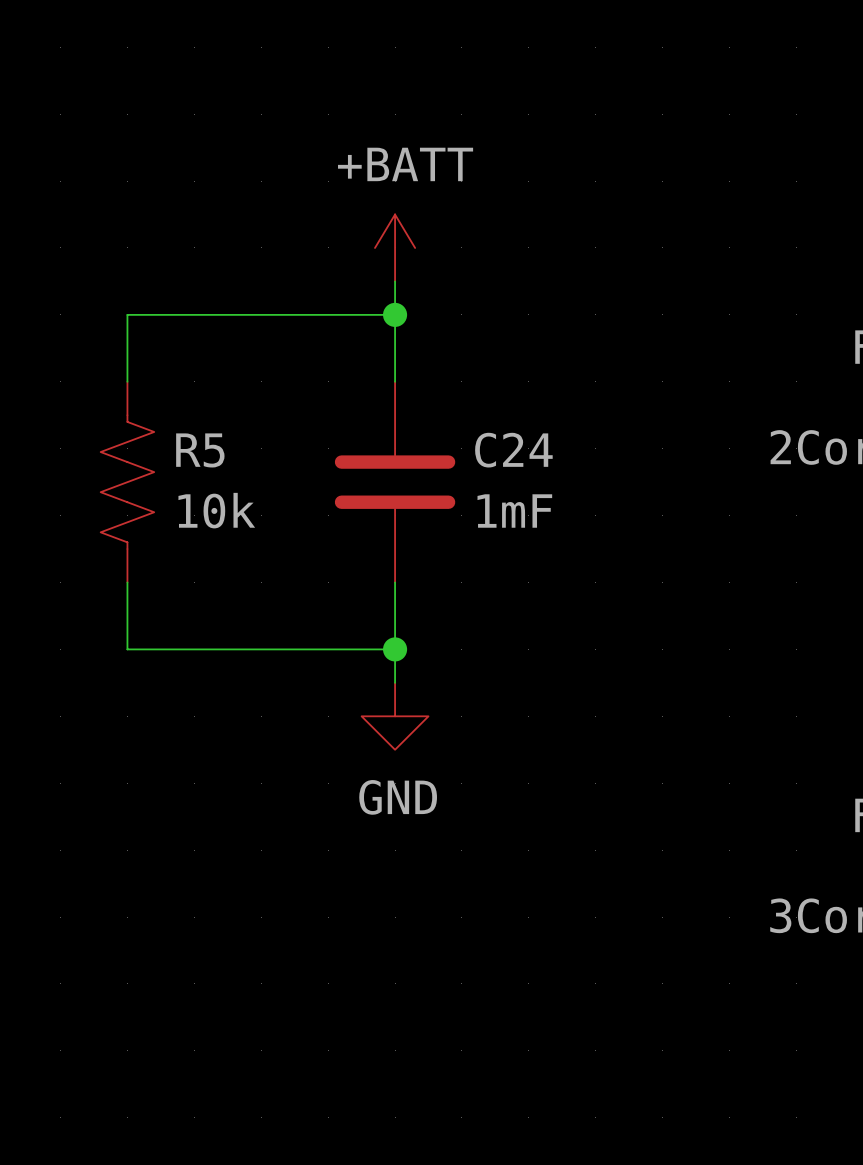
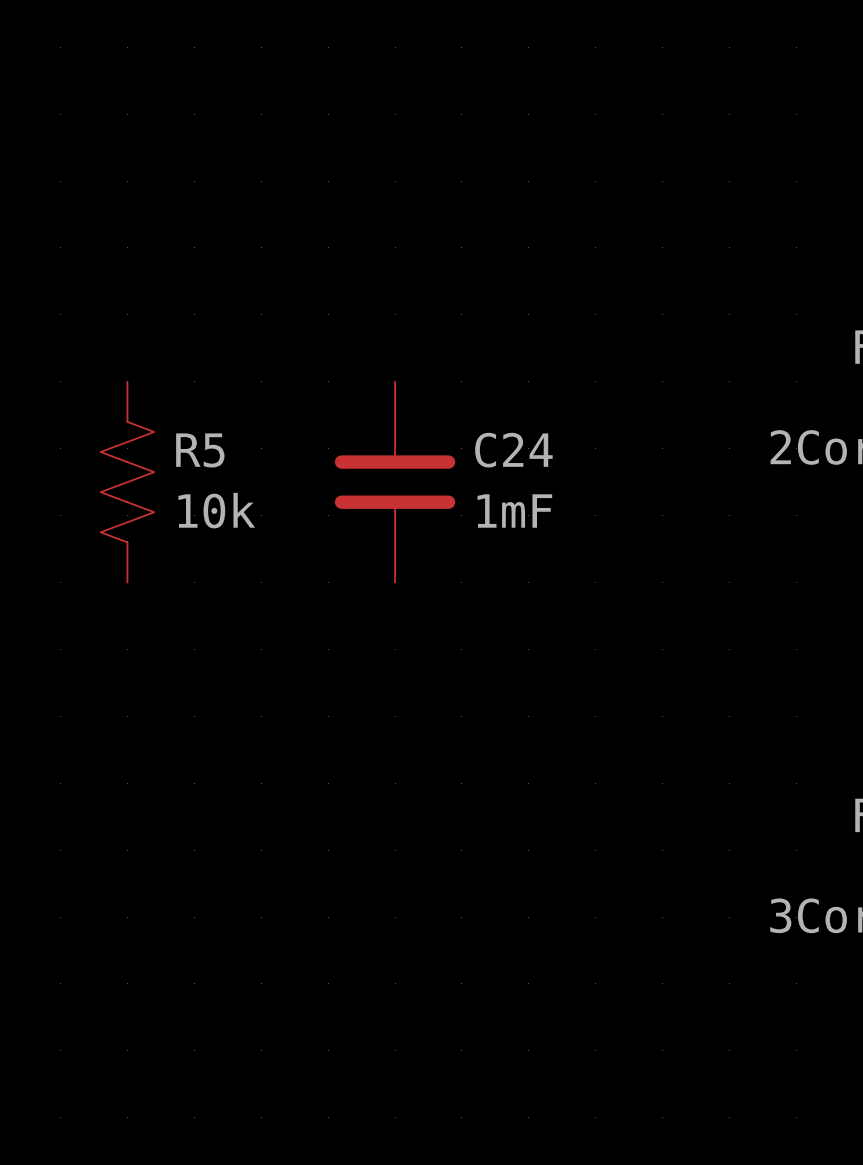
power symbol: +BATT (395, 247) -> none
wire: (395, 281) (395, 381) -> none
wire: (395, 314) (127, 314) (127, 381) -> none
junction: (395, 314) -> none
wire: (127, 582) (127, 649) (395, 649) -> none
wire: (395, 582) (395, 682) -> none
junction: (395, 649) -> none
power symbol: GND (395, 716) -> none

